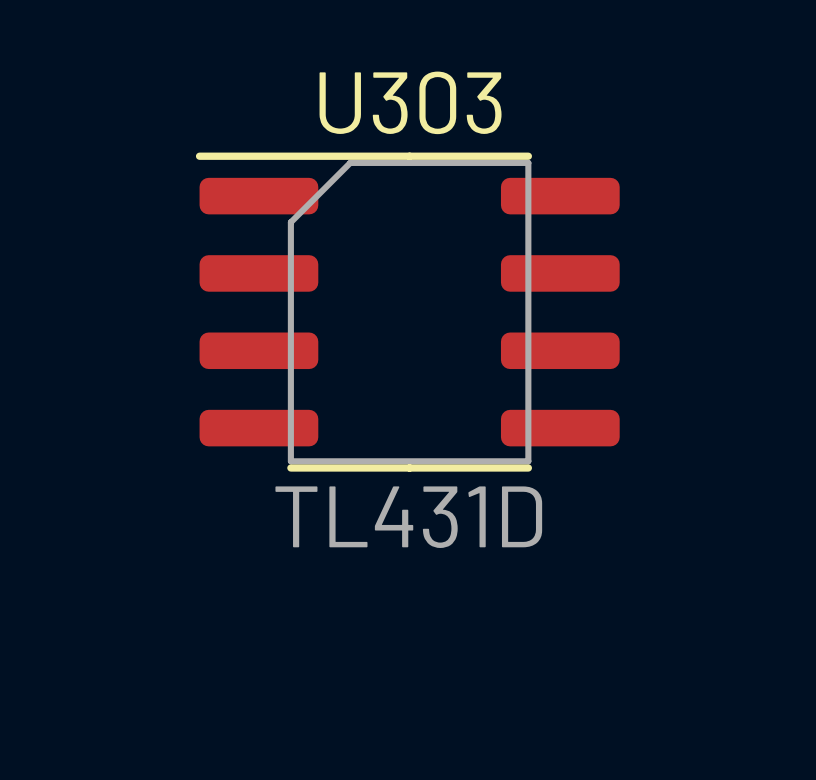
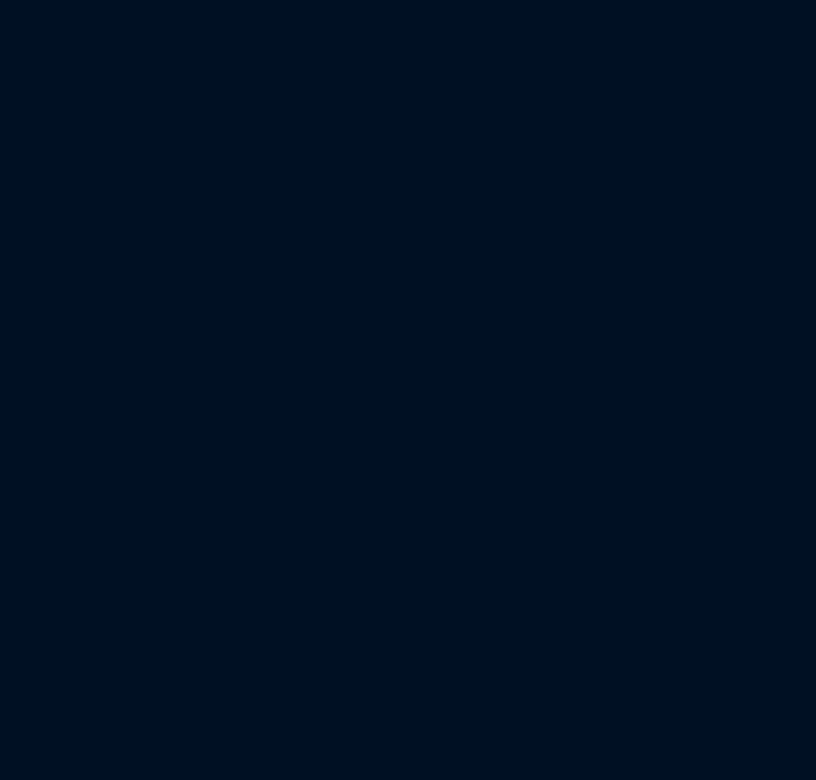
U303: TL431D (407, 312) -> none

